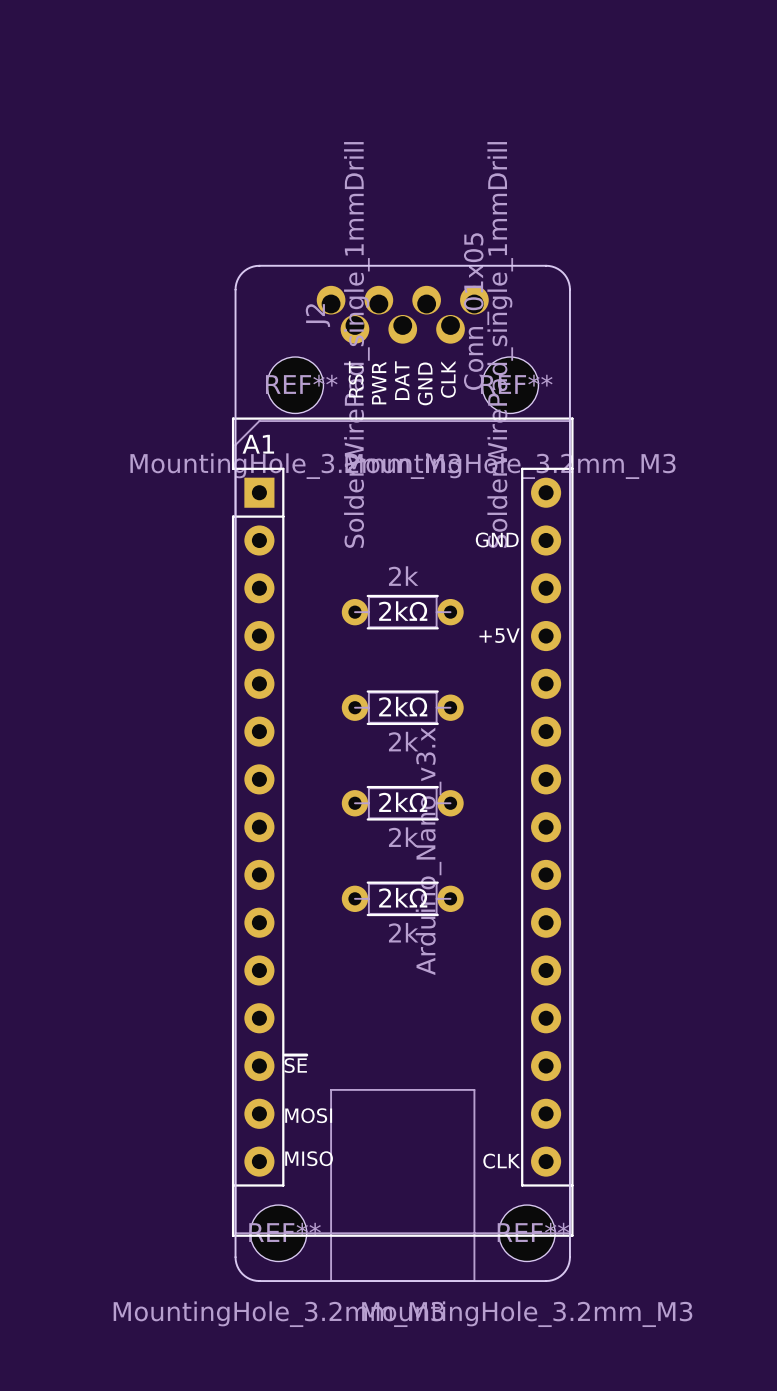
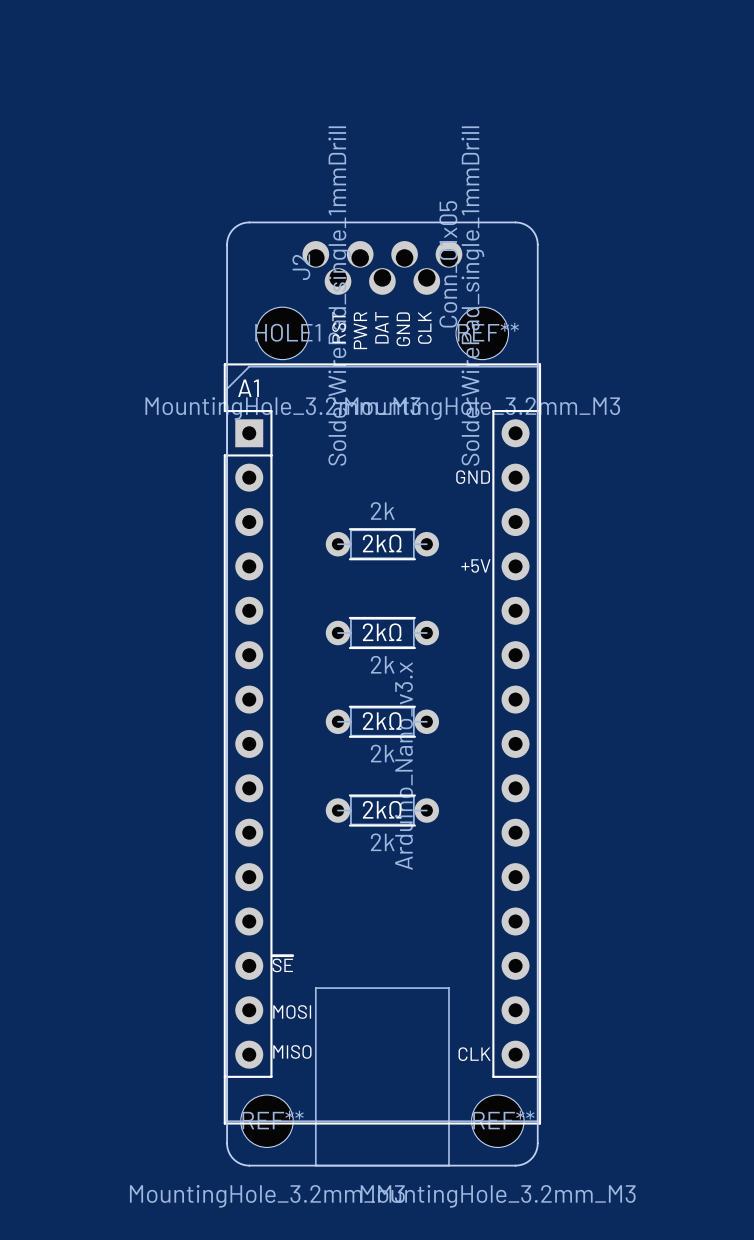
REF** name: REF** (301, 384) -> HOLE1 (287, 332)

